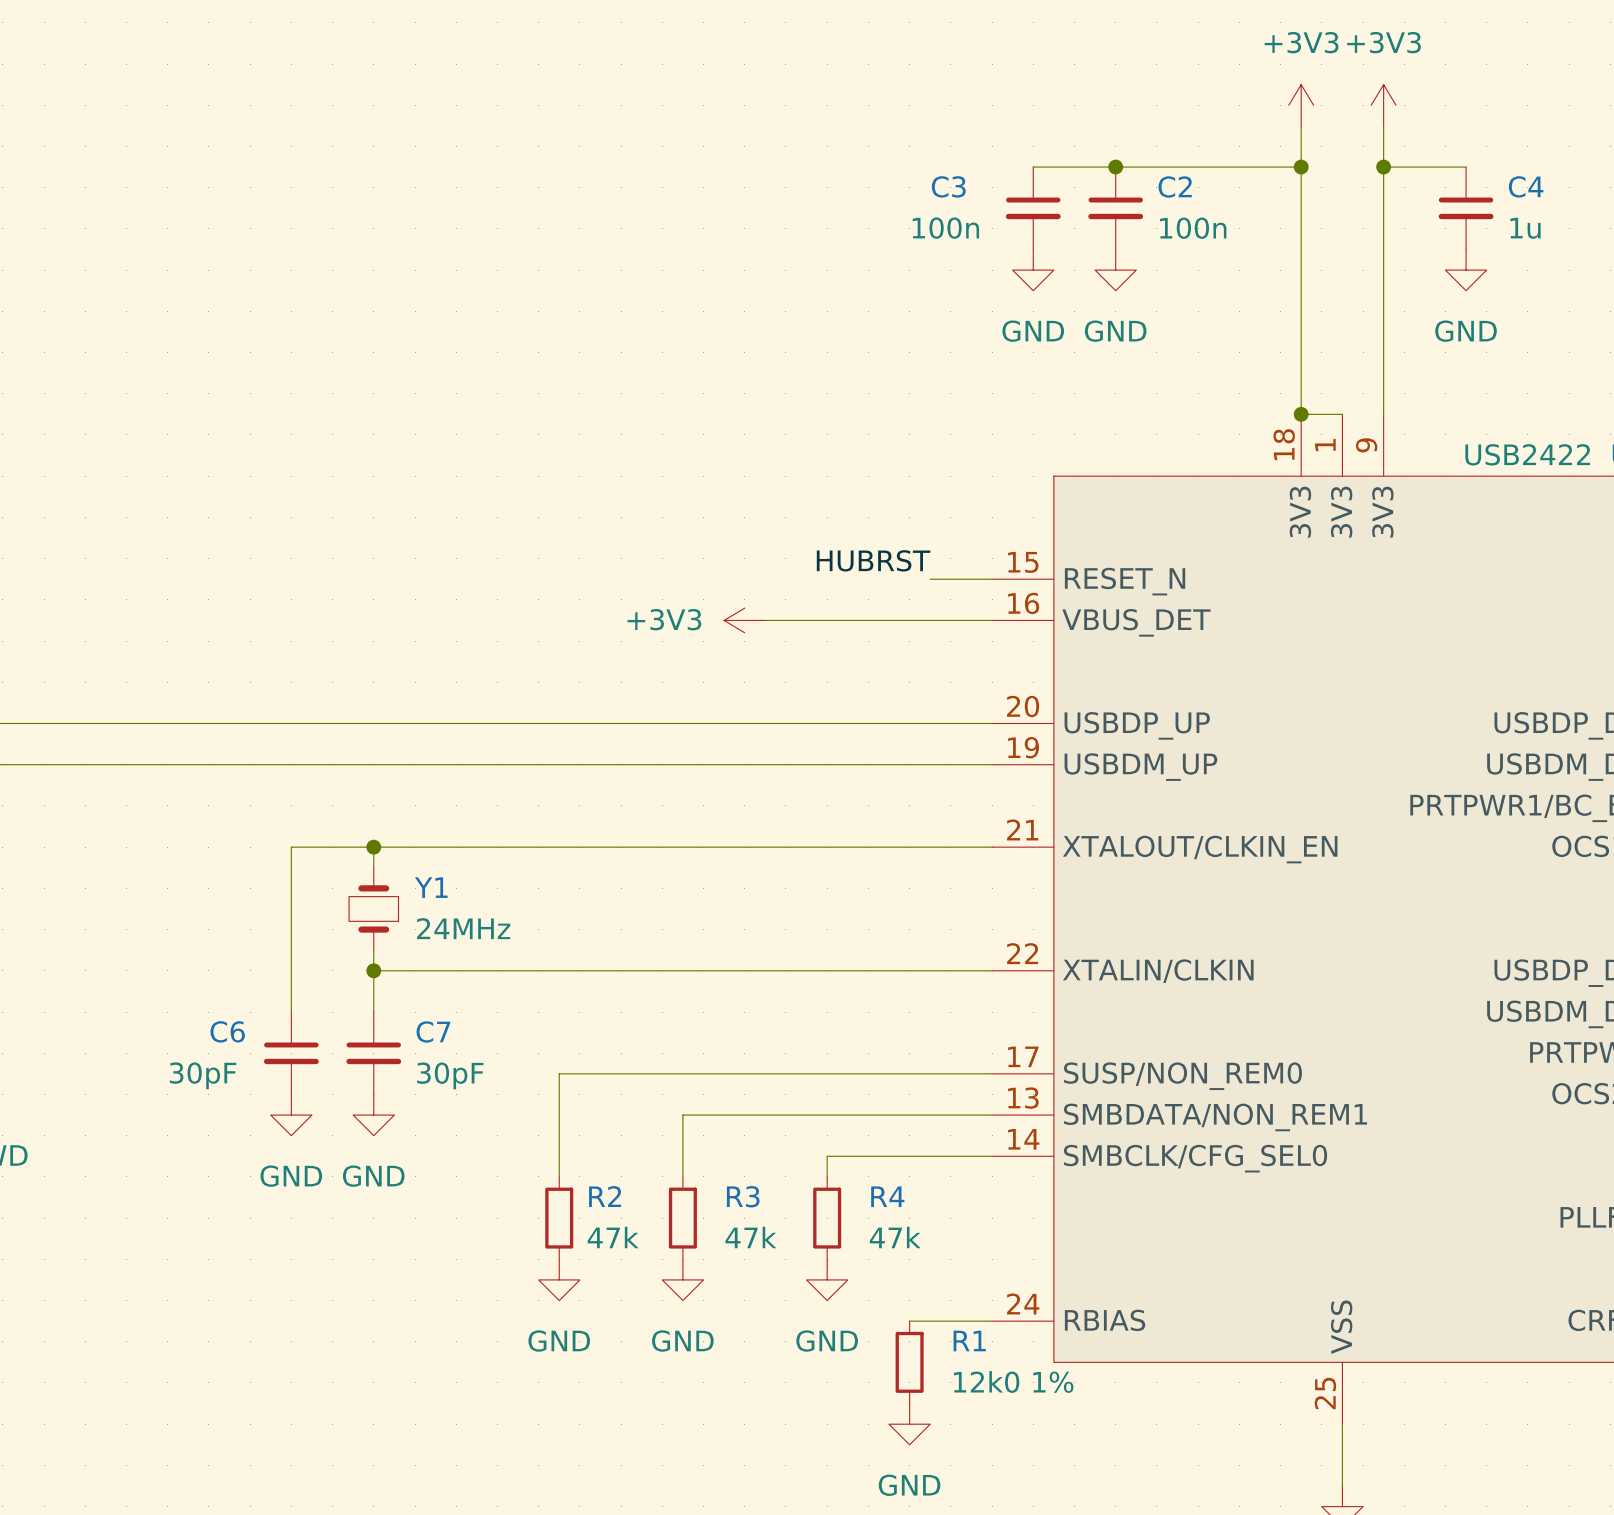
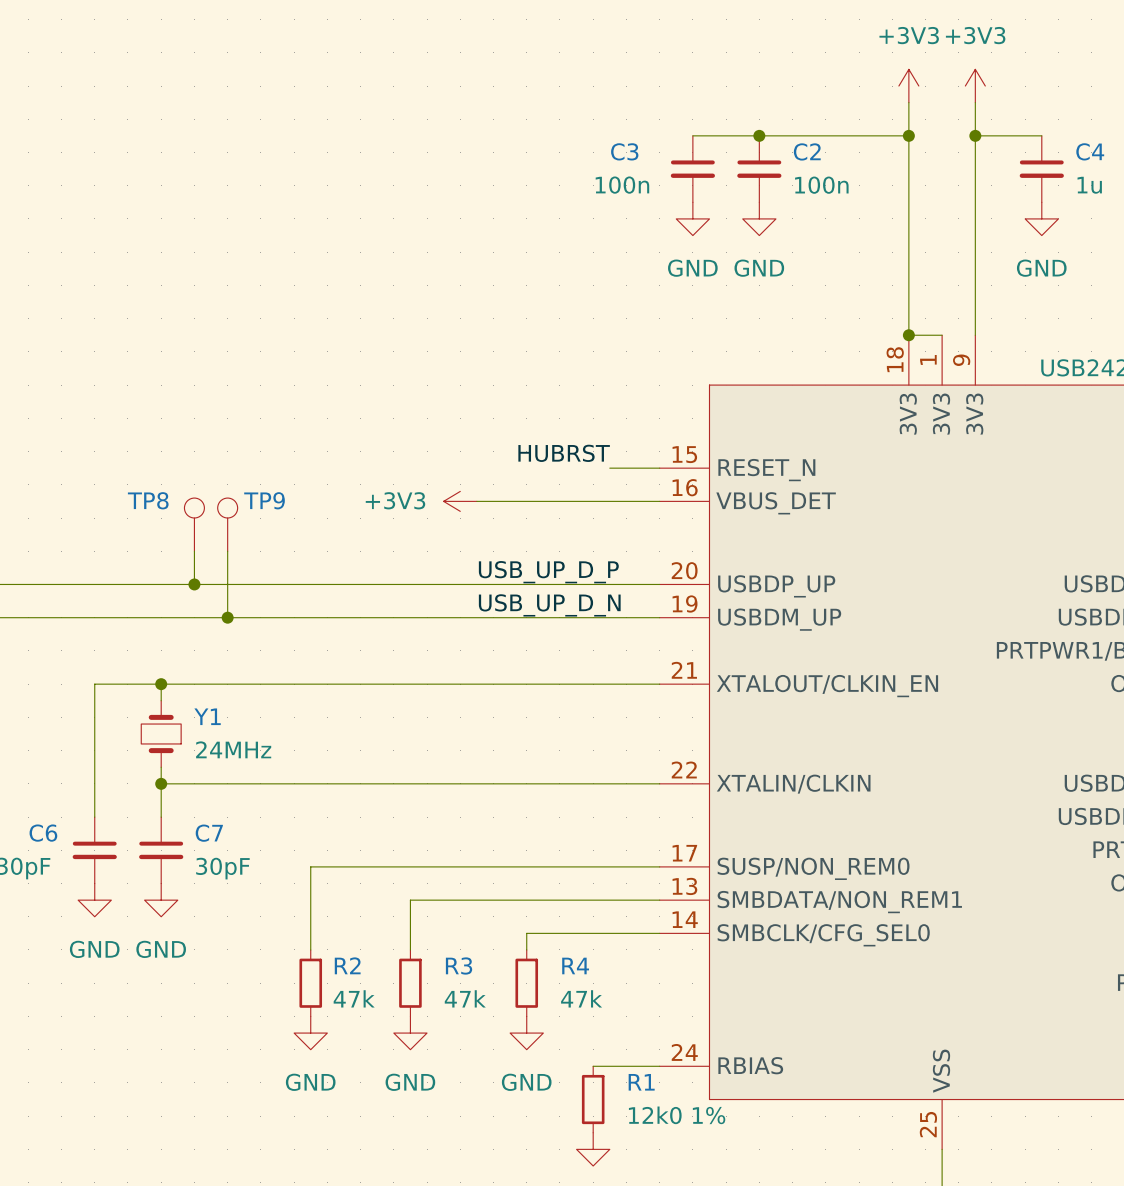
TP8: none -> (194, 524)
TP9: none -> (227, 524)
wire: none -> (194, 551) (194, 584)
wire: none -> (227, 551) (227, 617)
label: none -> USB_UP_D_P (548, 572)
junction: none -> (194, 584)
label: none -> USB_UP_D_N (549, 605)
junction: none -> (227, 617)

